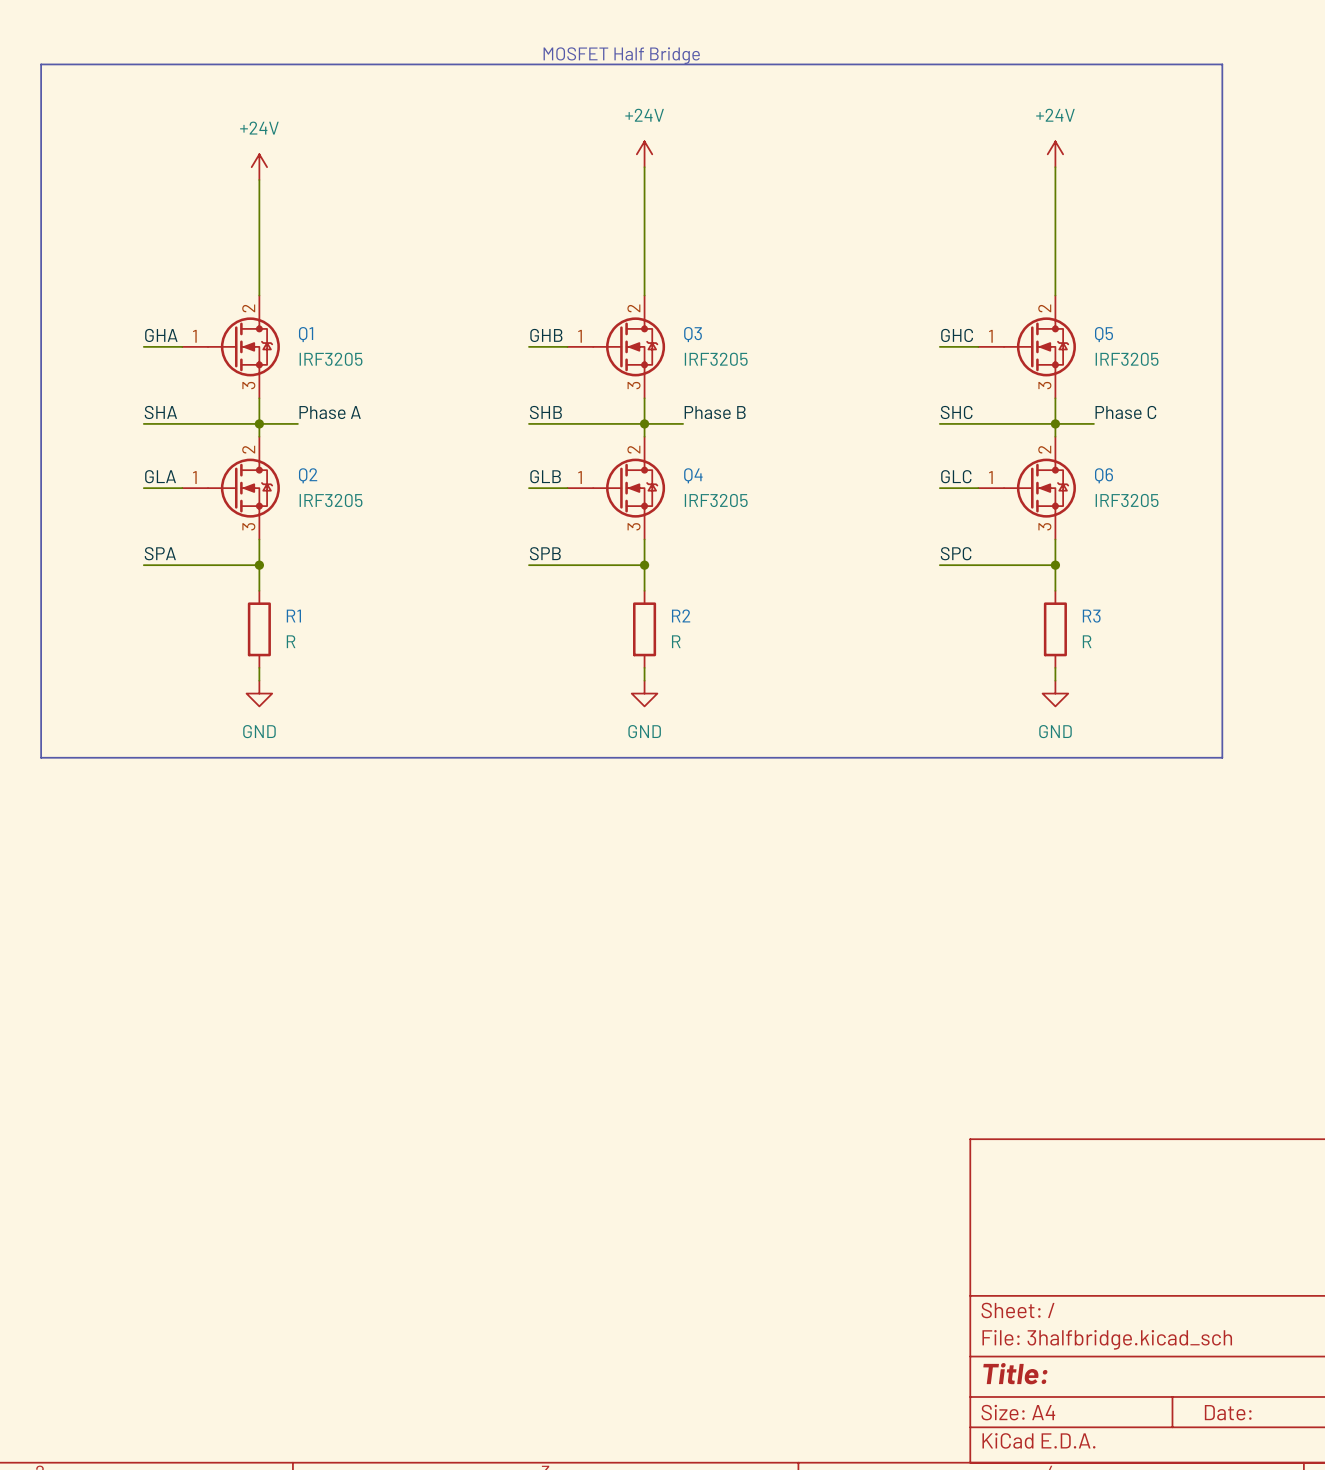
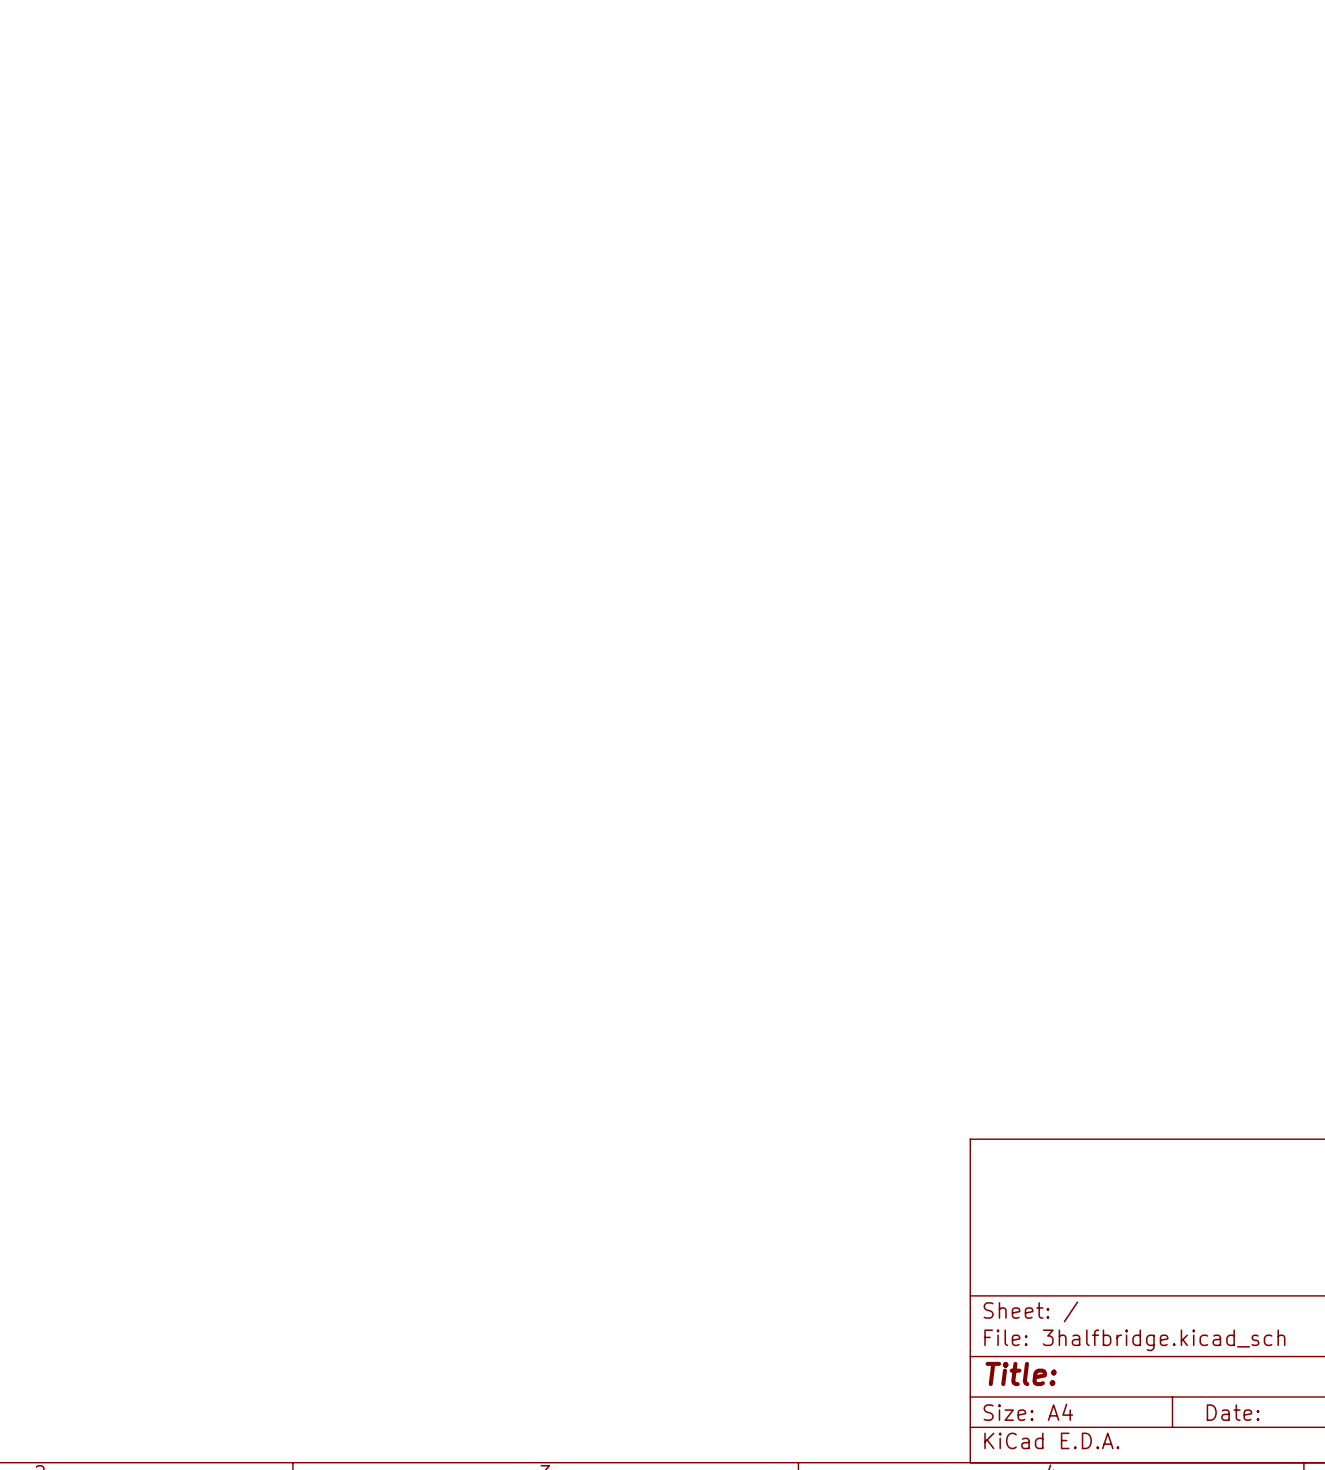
text: MOSFET Half Bridge (621, 55) -> none
line: (41, 64) (1222, 64) (1222, 757) (41, 757) (41, 64) -> none
power symbol: +24V (644, 154) -> none
power symbol: +24V (1055, 154) -> none
power symbol: +24V (259, 167) -> none
wire: (644, 167) (644, 295) -> none
wire: (1055, 167) (1055, 295) -> none
wire: (259, 179) (259, 295) -> none
label: GHA (161, 335) -> none
label: GHB (546, 335) -> none
label: GHC (957, 335) -> none
wire: (143, 346) (182, 346) -> none
Q1: IRF3205 (231, 346) -> none
wire: (529, 346) (567, 346) -> none
Q3: IRF3205 (616, 346) -> none
wire: (939, 346) (978, 346) -> none
Q5: IRF3205 (1027, 346) -> none
wire: (259, 398) (259, 436) -> none
wire: (644, 398) (644, 436) -> none
wire: (1055, 398) (1055, 436) -> none
label: SHA (160, 412) -> none
label: Phase A (330, 412) -> none
label: SHB (545, 412) -> none
label: Phase B (715, 412) -> none
label: SHC (956, 412) -> none
label: Phase C (1125, 412) -> none
wire: (143, 423) (297, 423) -> none
junction: (259, 423) -> none
wire: (529, 423) (683, 423) -> none
junction: (644, 423) -> none
wire: (939, 423) (1093, 423) -> none
junction: (1055, 423) -> none
label: GLA (160, 476) -> none
label: GLB (545, 476) -> none
label: GLC (956, 476) -> none
wire: (143, 488) (182, 488) -> none
Q2: IRF3205 (231, 488) -> none
wire: (529, 488) (567, 488) -> none
Q4: IRF3205 (616, 488) -> none
wire: (939, 488) (978, 488) -> none
Q6: IRF3205 (1027, 488) -> none
wire: (259, 539) (259, 590) -> none
wire: (644, 539) (644, 590) -> none
wire: (1055, 539) (1055, 590) -> none
label: SPA (160, 553) -> none
label: SPB (545, 553) -> none
label: SPC (956, 553) -> none
wire: (143, 565) (259, 565) -> none
junction: (259, 565) -> none
wire: (529, 565) (644, 565) -> none
junction: (644, 565) -> none
wire: (939, 565) (1055, 565) -> none
junction: (1055, 565) -> none
R1: R (259, 629) -> none
R2: R (644, 629) -> none
R3: R (1055, 629) -> none
wire: (259, 667) (259, 680) -> none
wire: (644, 667) (644, 680) -> none
wire: (1055, 667) (1055, 680) -> none
power symbol: GND (259, 693) -> none
power symbol: GND (644, 693) -> none
power symbol: GND (1055, 693) -> none

